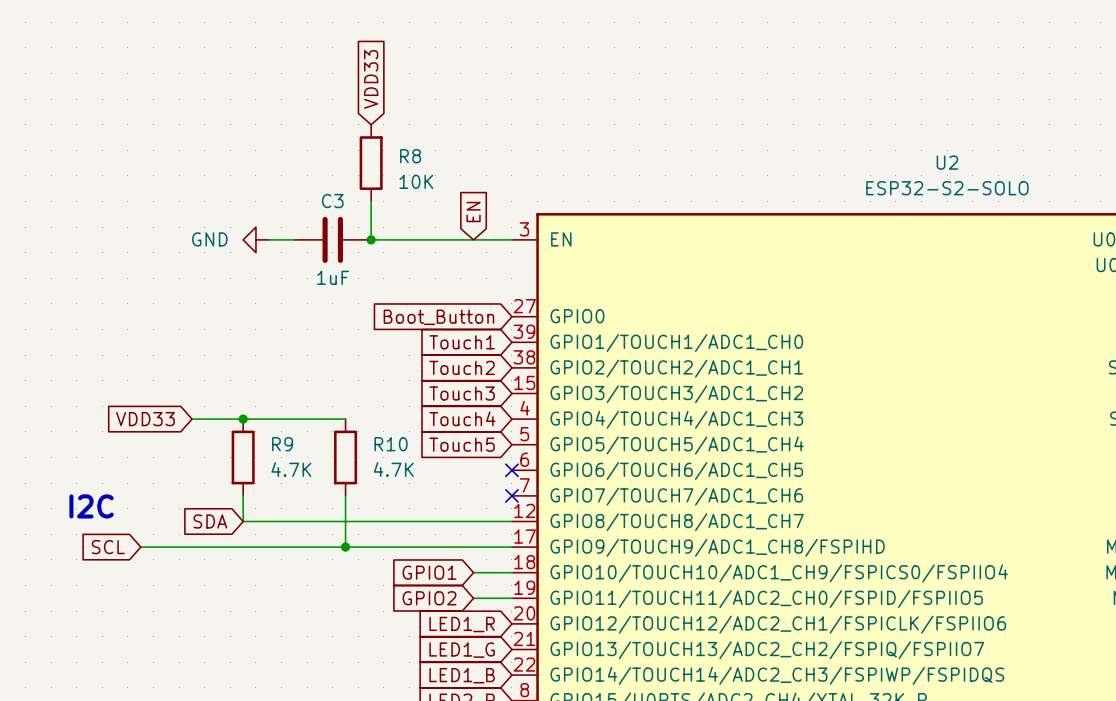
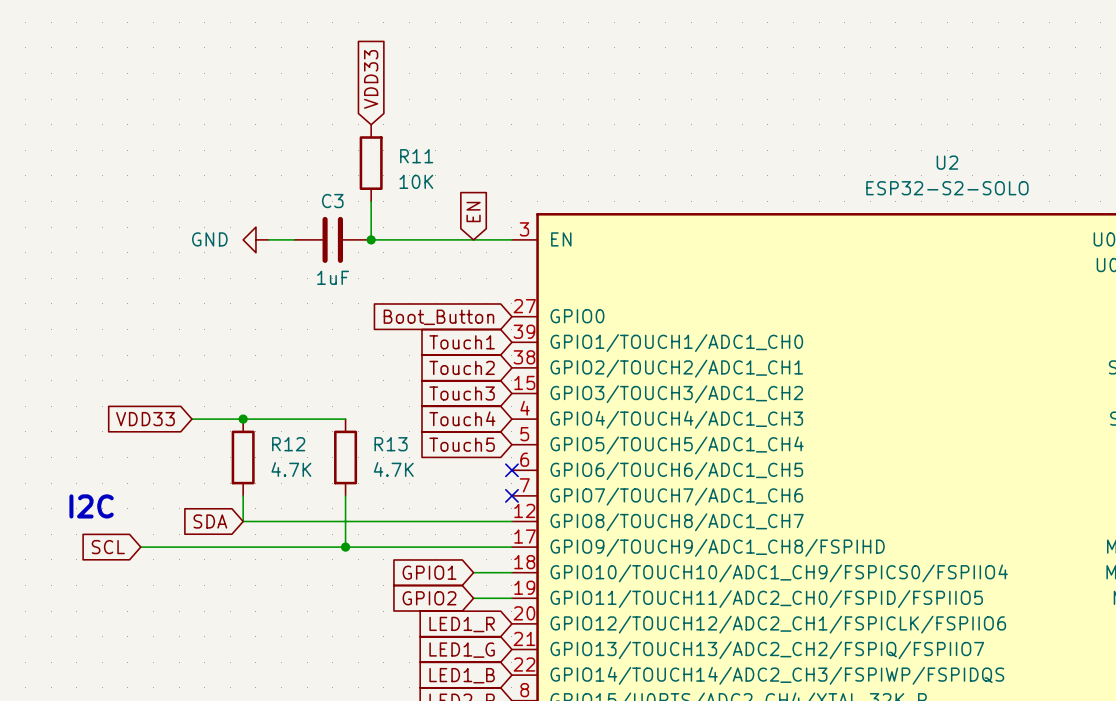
R8 name: R8 (410, 156) -> R11 (416, 156)
R9 name: R9 (282, 444) -> R12 (288, 444)
R10 name: R10 (391, 444) -> R13 (391, 444)

